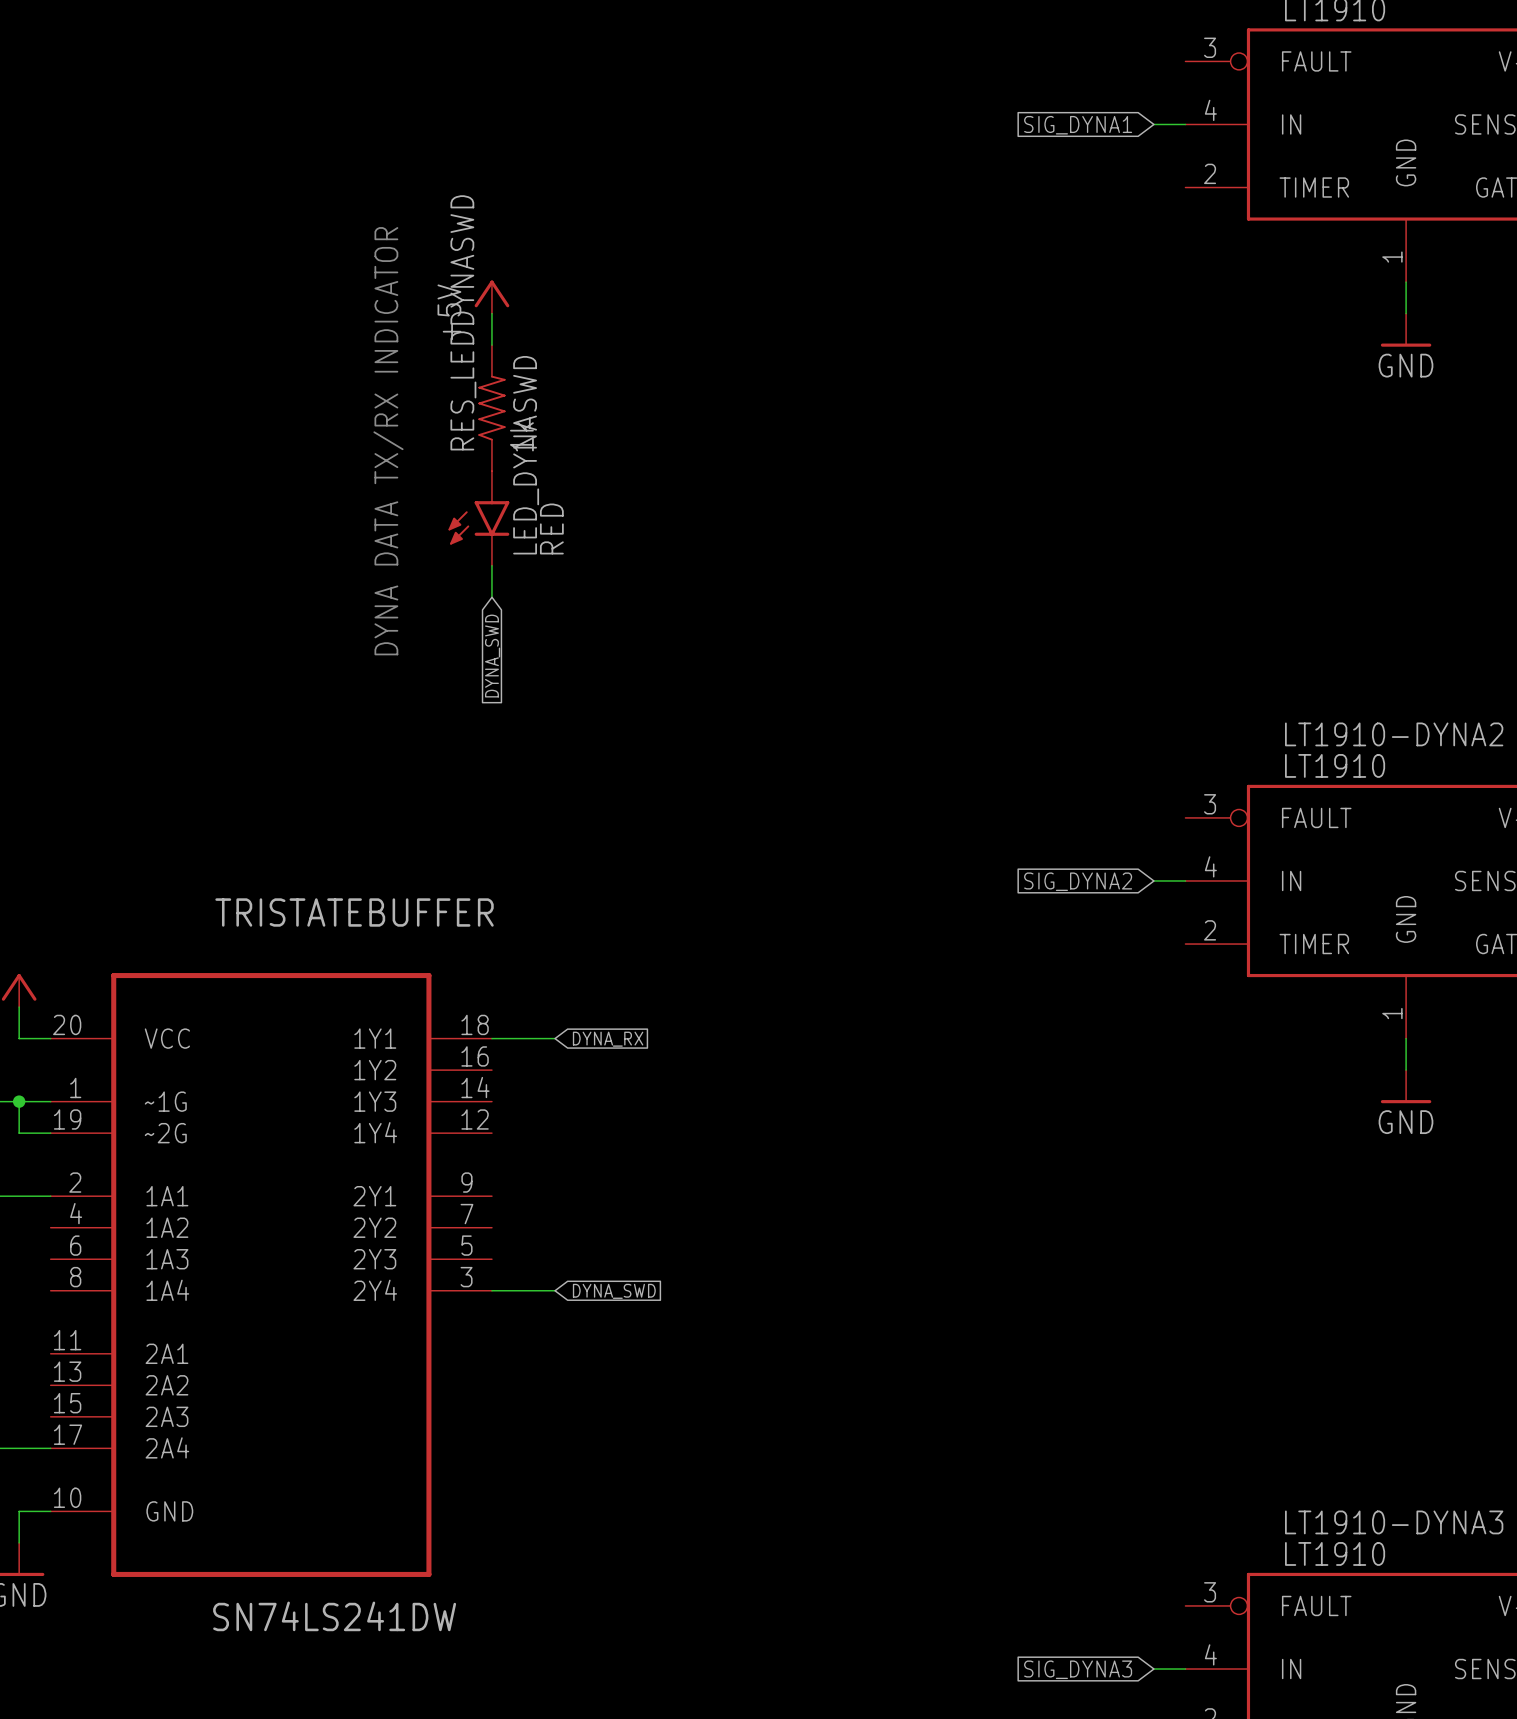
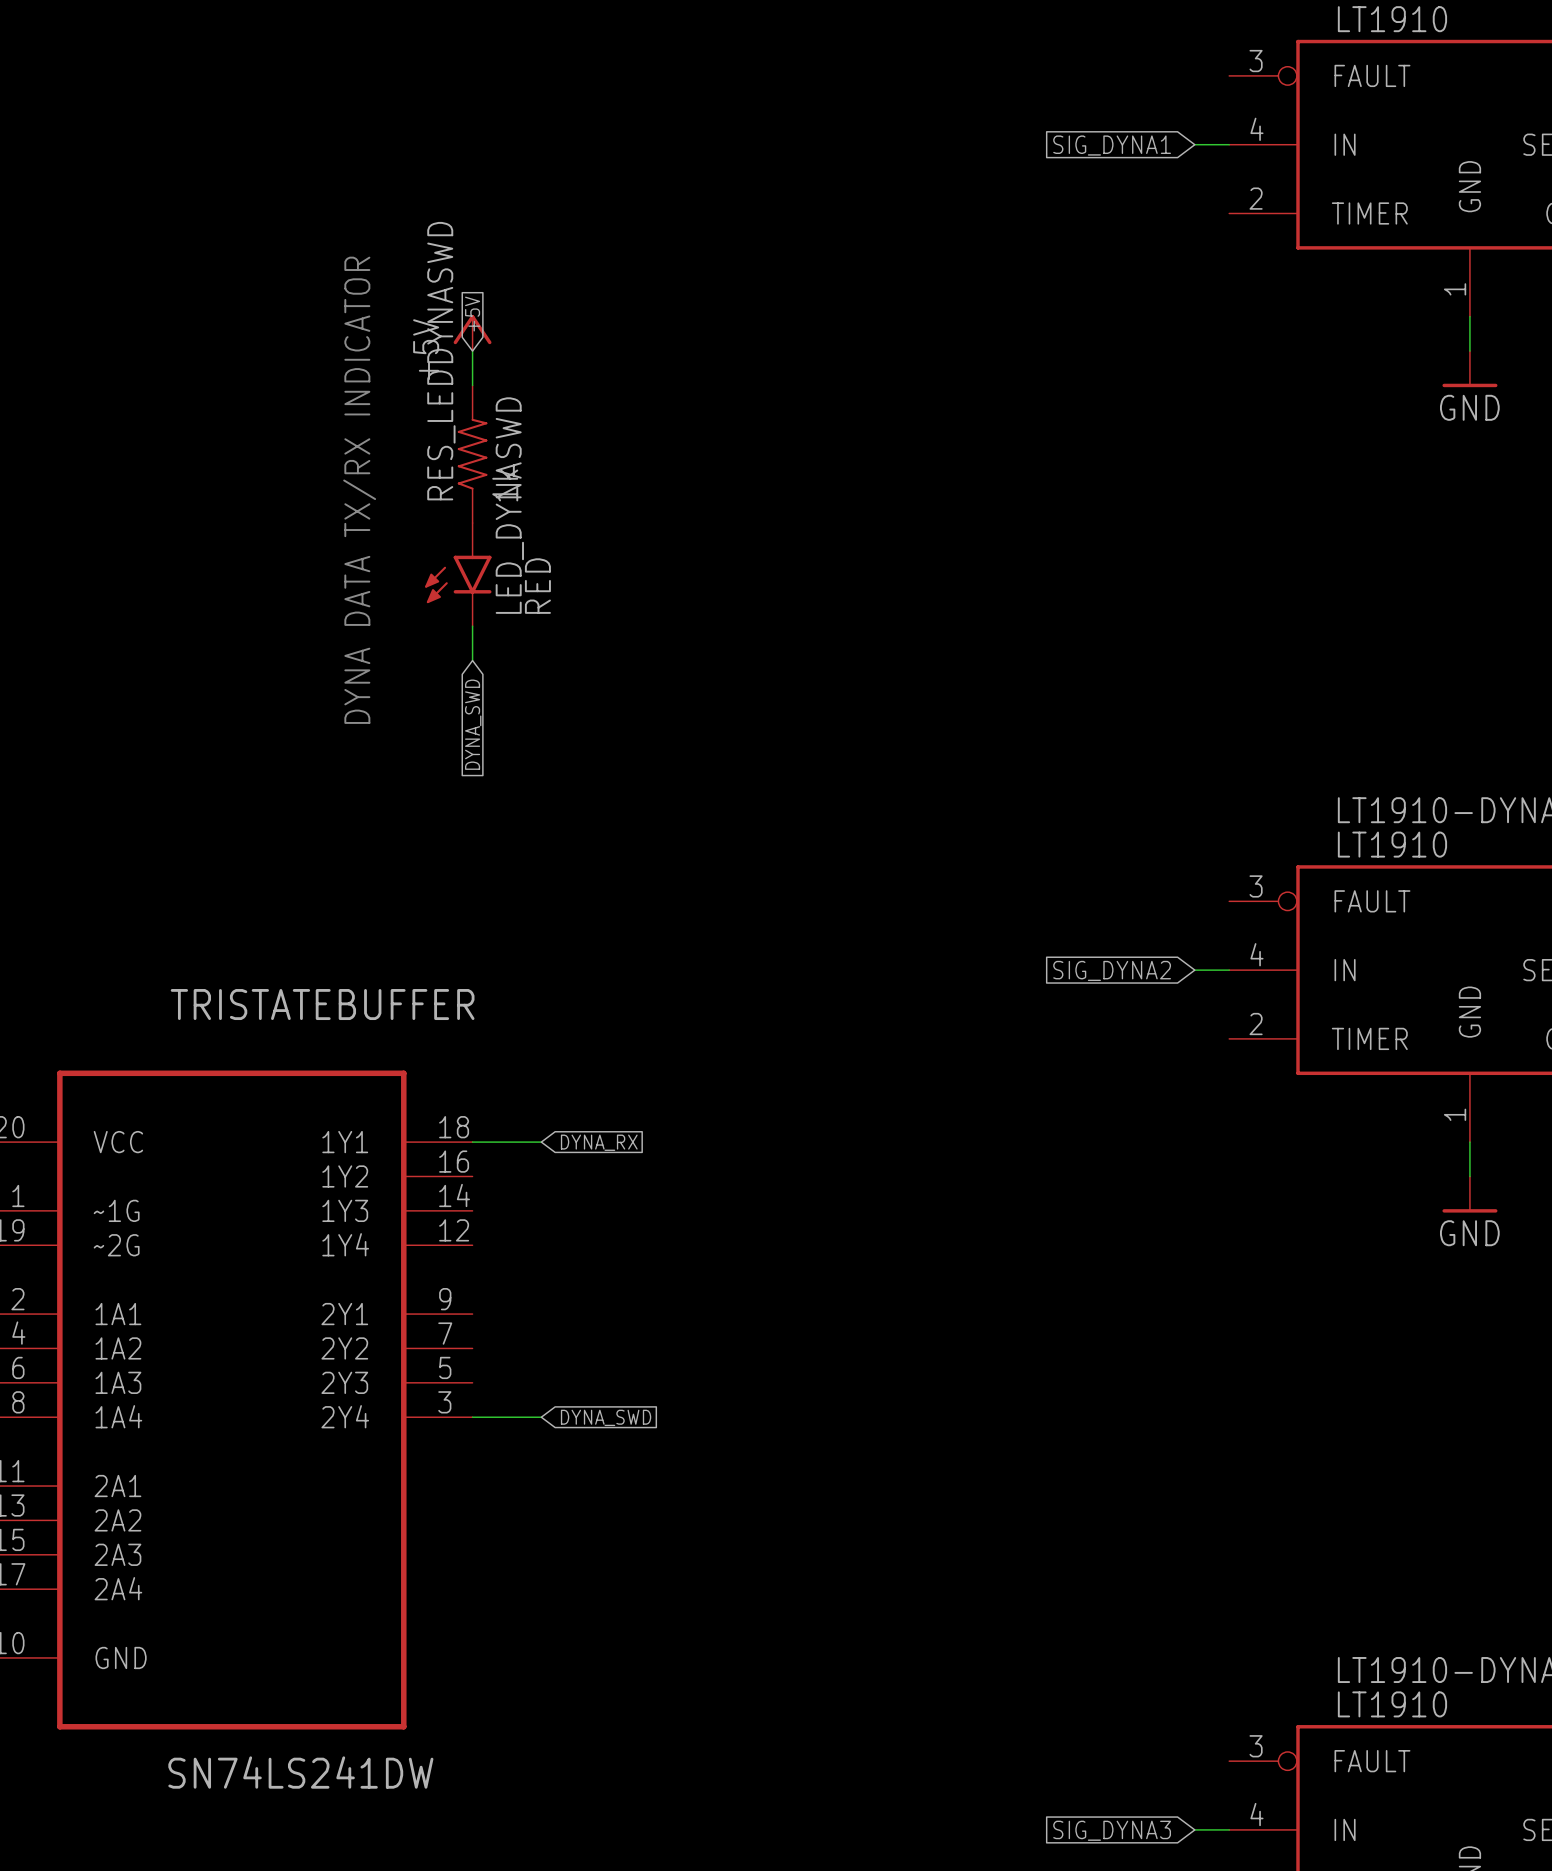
global label: none -> +5V (472, 314)

